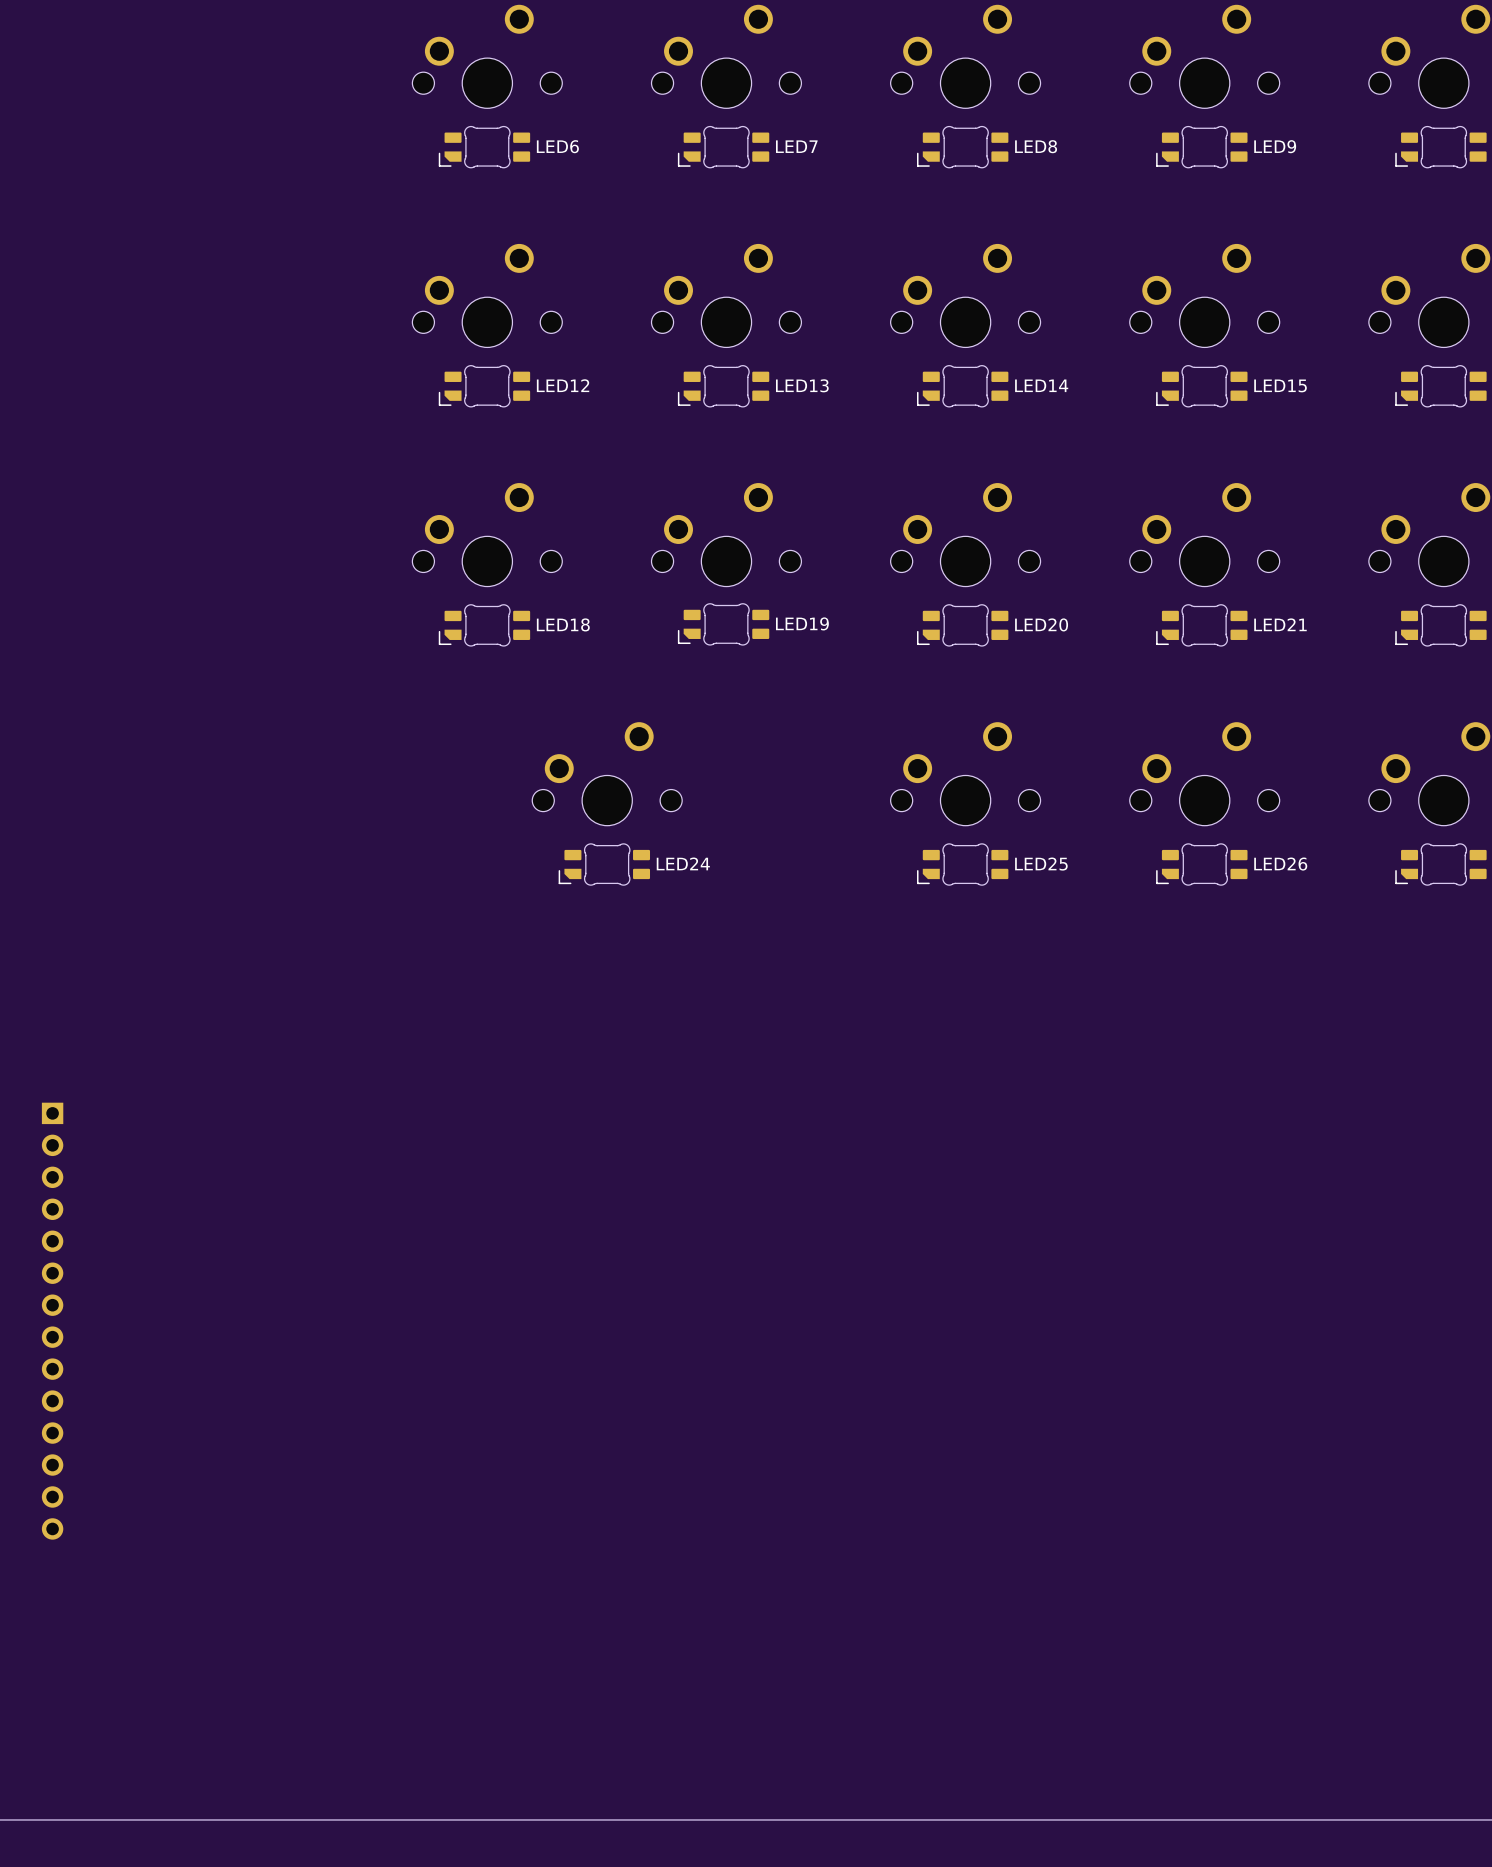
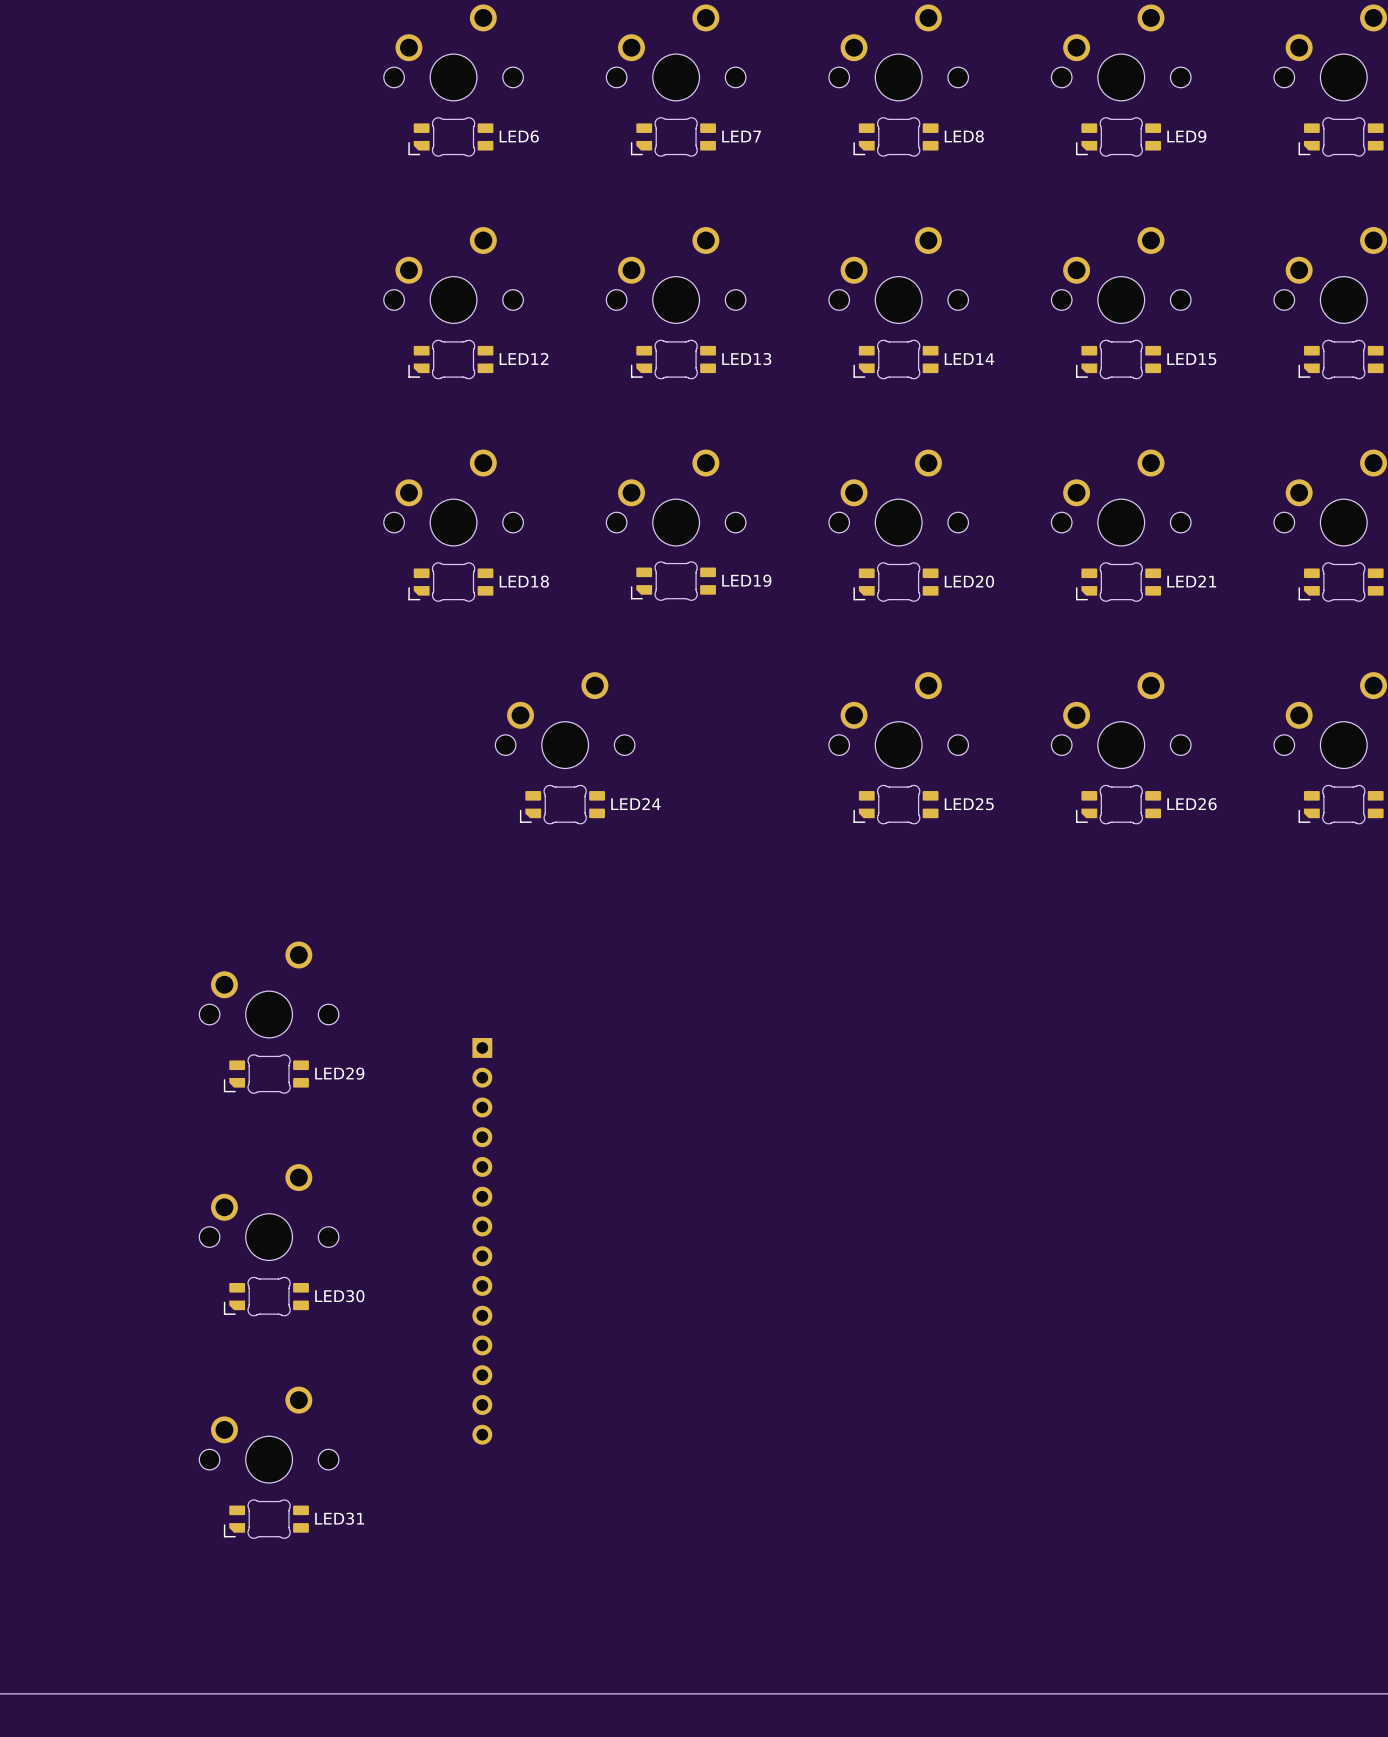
part: none -> (269, 989)
LED29: none -> (266, 1074)
part: none -> (269, 1212)
part: (52, 1321) -> none
part: none -> (482, 1241)
LED30: none -> (266, 1296)
part: none -> (269, 1434)
LED31: none -> (266, 1519)

